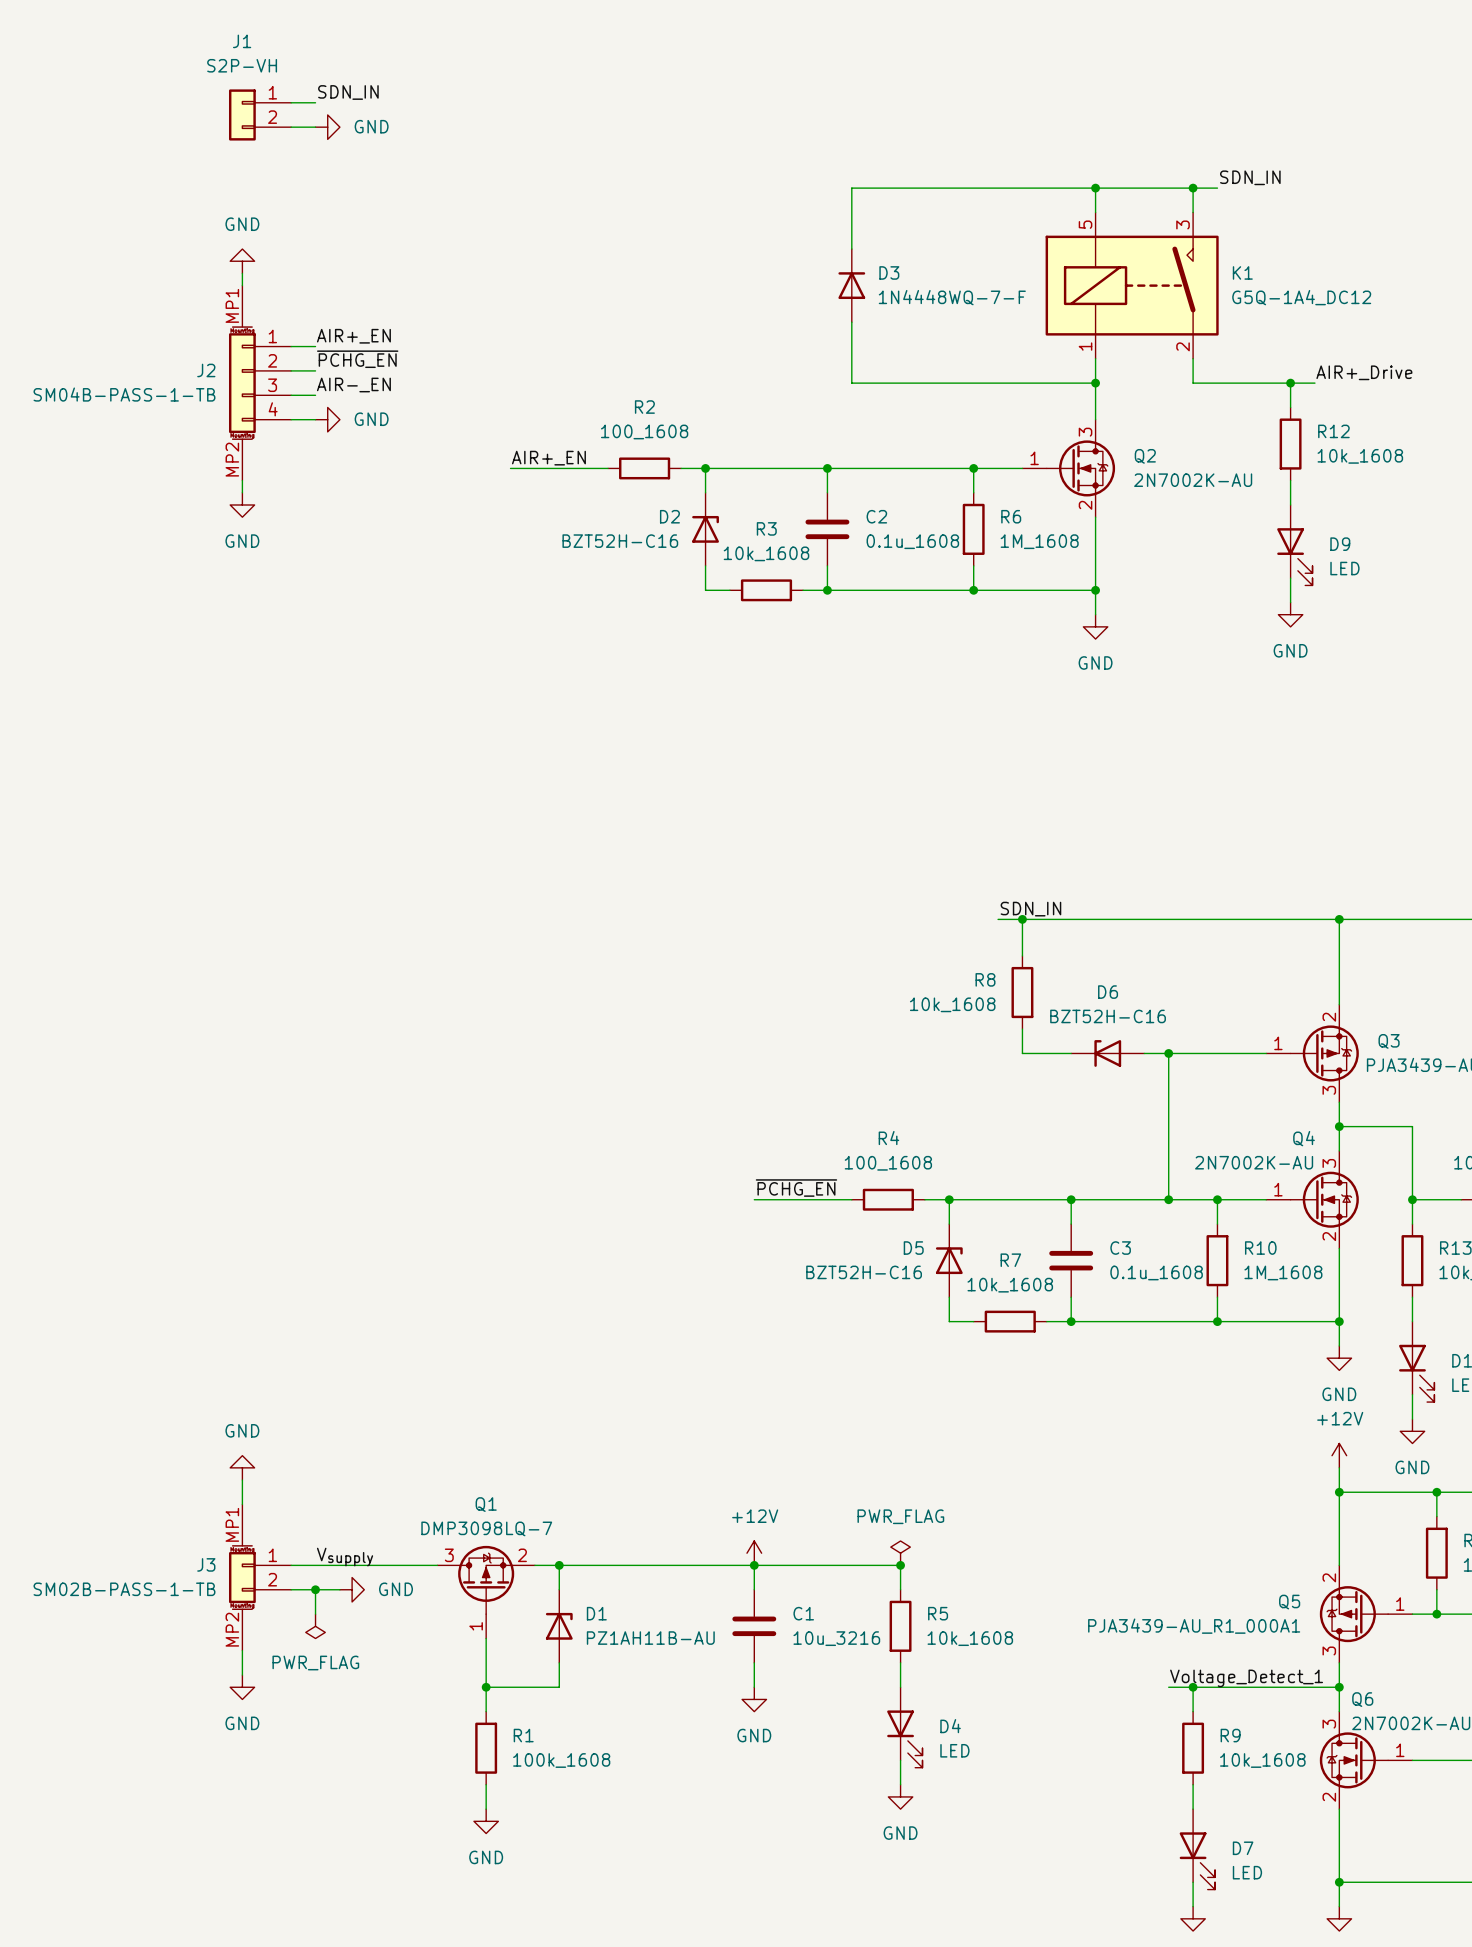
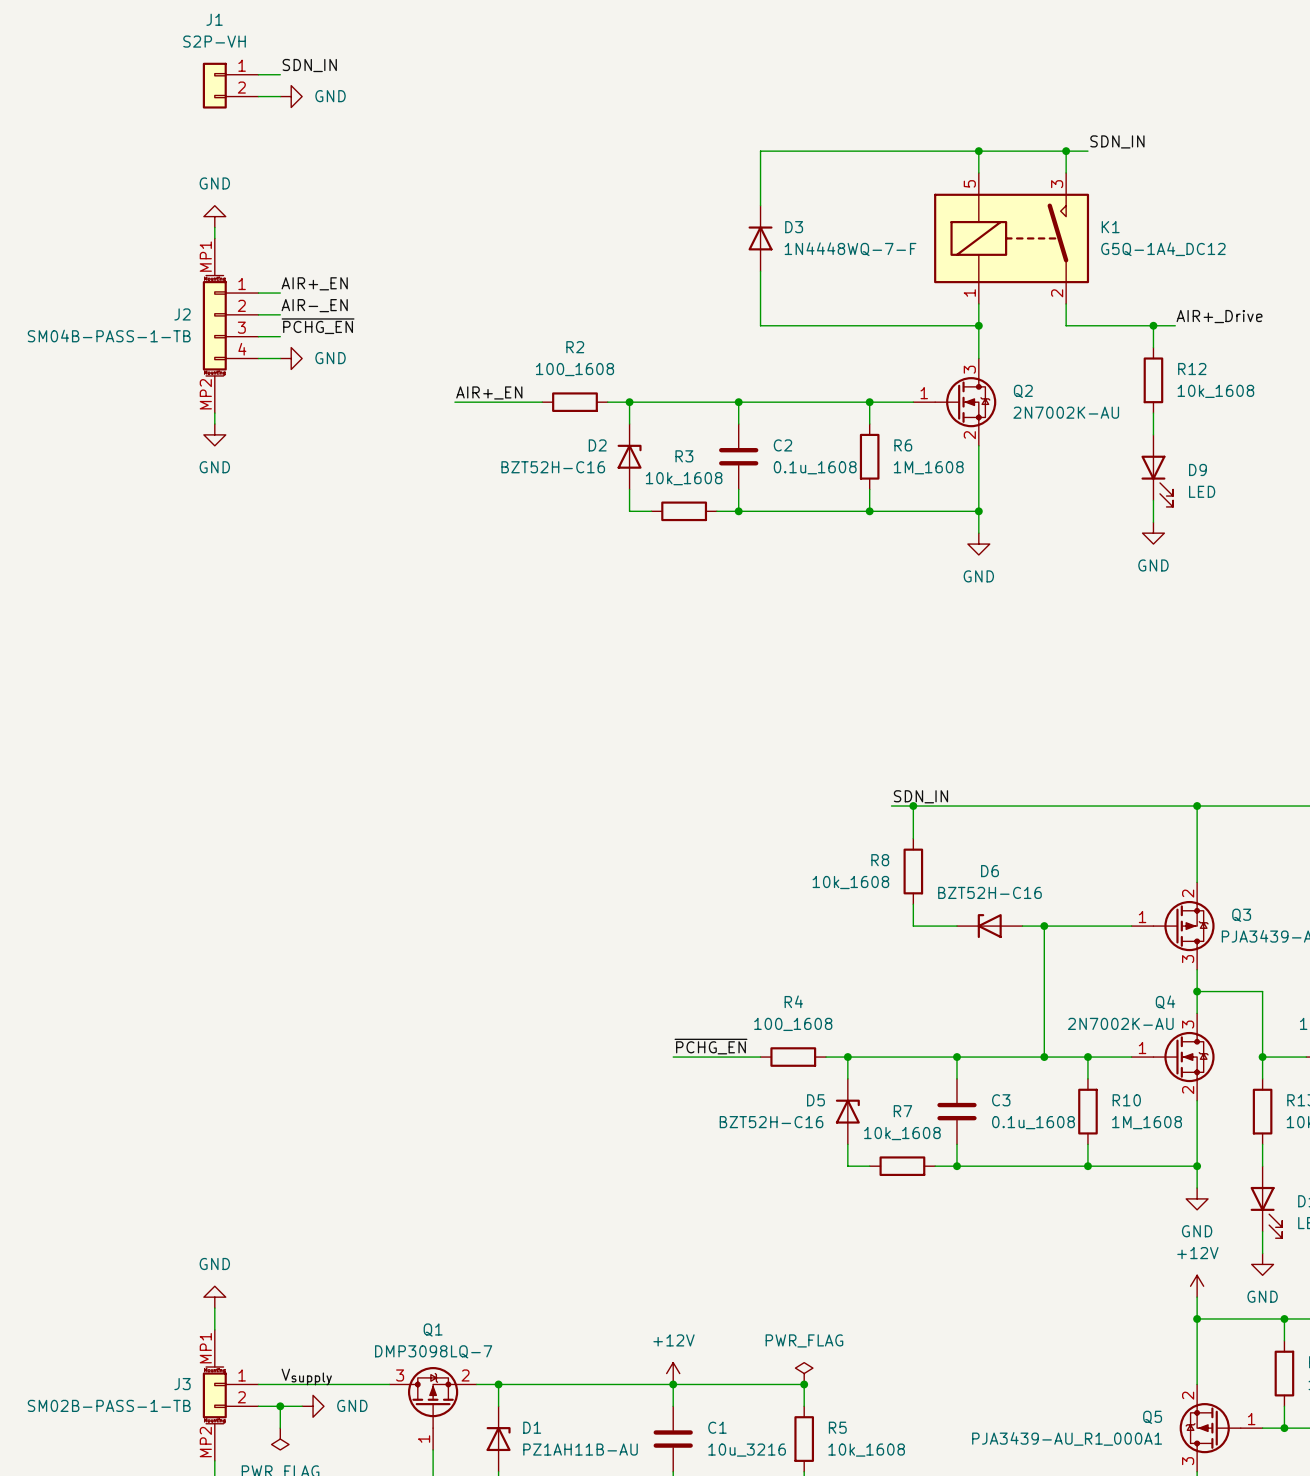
label: ~{PCHG_EN} (357, 359) -> AIR-_EN (314, 305)
label: AIR-_EN (353, 385) -> ~{PCHG_EN} (318, 326)

